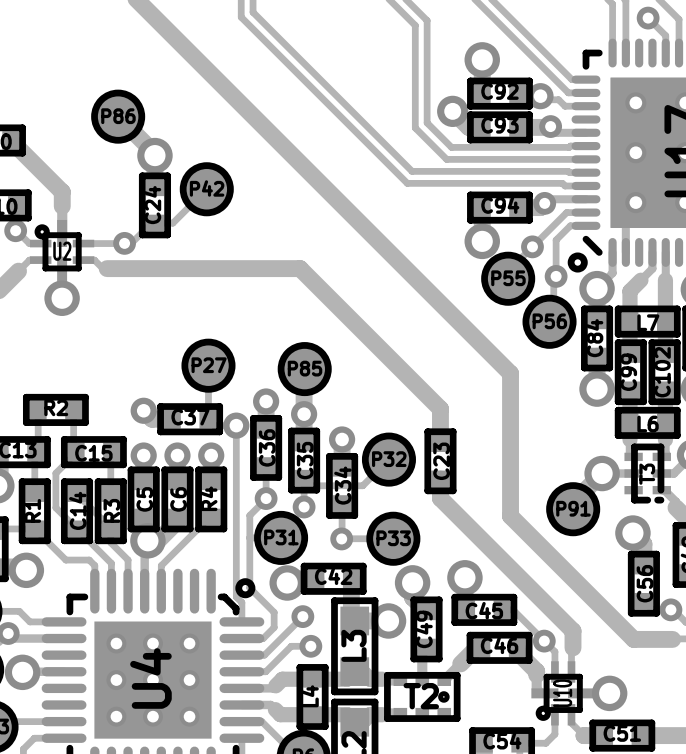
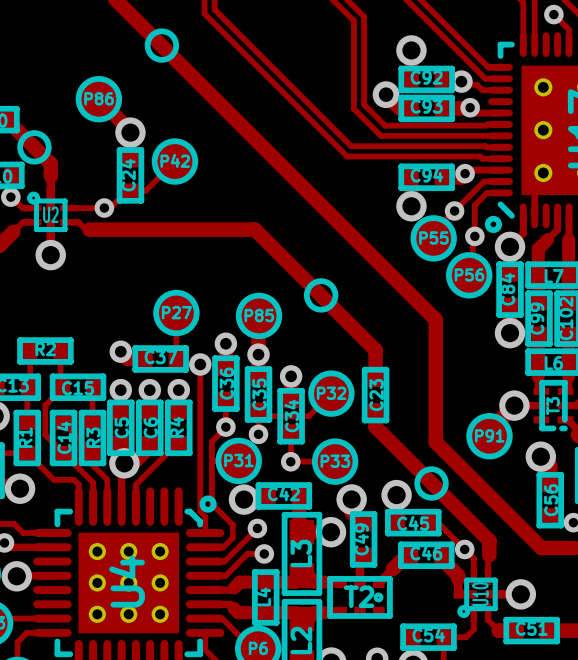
drawing: none -> [144, 28, 180, 63]
drawing: none -> [17, 130, 52, 165]
drawing: none -> [303, 278, 339, 313]
drawing: none -> [414, 466, 449, 501]

